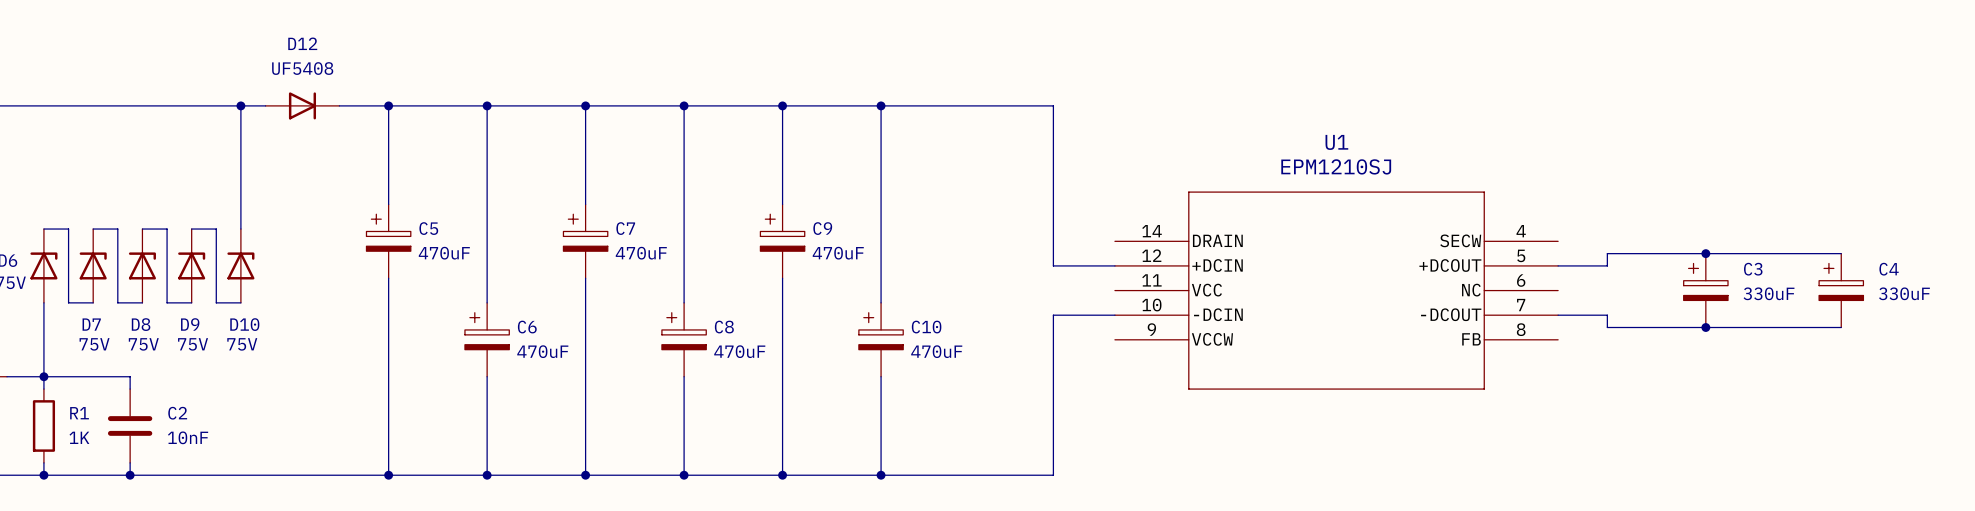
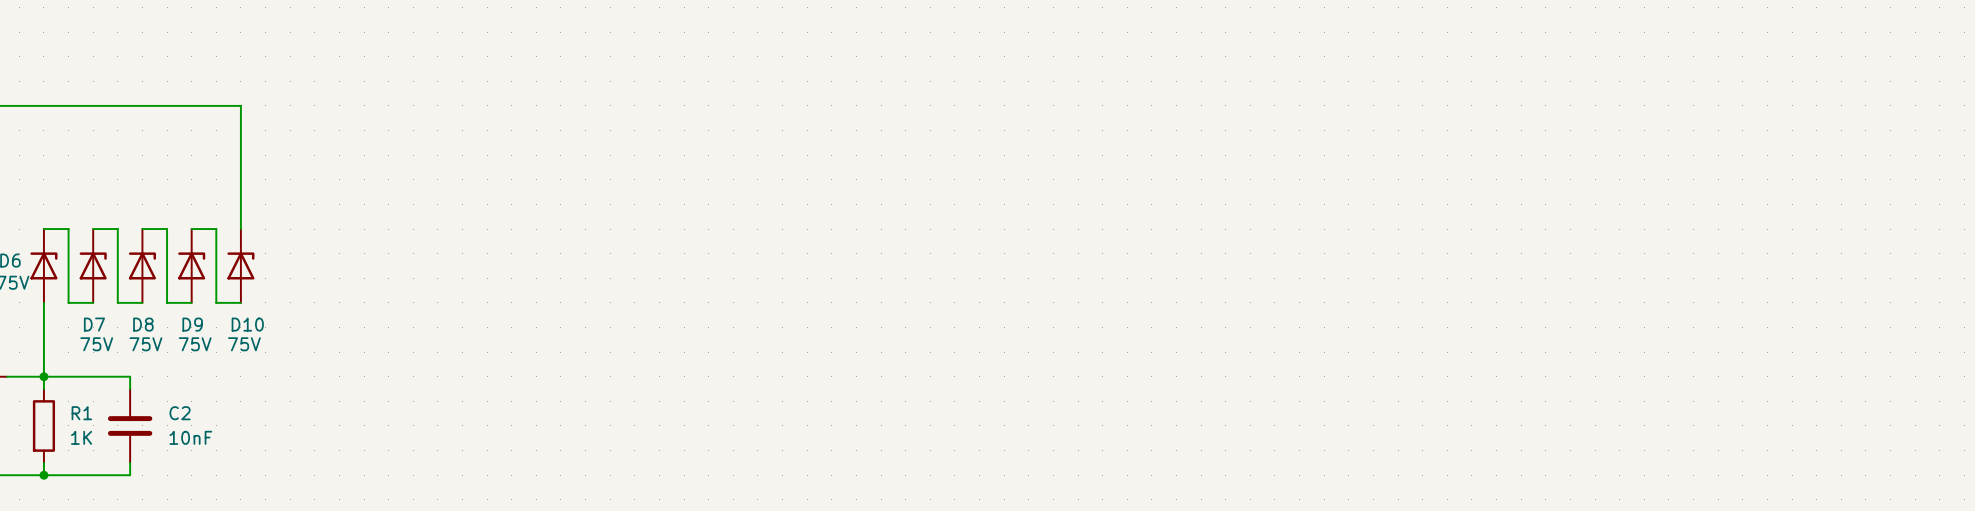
wire: (240, 105) (265, 105) -> none
junction: (240, 105) -> none
D12: UF5408 (302, 105) -> none
wire: (339, 105) (1053, 105) (1053, 265) (1114, 265) -> none
wire: (388, 105) (388, 204) -> none
junction: (388, 105) -> none
wire: (487, 105) (487, 302) -> none
junction: (487, 105) -> none
wire: (585, 105) (585, 204) -> none
junction: (585, 105) -> none
wire: (684, 105) (684, 302) -> none
junction: (684, 105) -> none
wire: (782, 105) (782, 204) -> none
junction: (782, 105) -> none
wire: (881, 105) (881, 302) -> none
junction: (881, 105) -> none
C5: 470uF (388, 241) -> none
C7: 470uF (585, 241) -> none
C9: 470uF (782, 241) -> none
junction: (1705, 253) -> none
wire: (1841, 253) (1607, 253) (1607, 265) (1558, 265) -> none
wire: (388, 278) (388, 475) -> none
wire: (585, 278) (585, 475) -> none
wire: (782, 278) (782, 475) -> none
U1: EPM1210SJ (1336, 290) -> none
C3: 330uF (1705, 290) -> none
C4: 330uF (1841, 290) -> none
wire: (1114, 315) (1053, 315) (1053, 475) (130, 475) -> none
wire: (1558, 315) (1607, 315) (1607, 327) (1841, 327) -> none
junction: (1705, 327) -> none
C6: 470uF (487, 339) -> none
C8: 470uF (684, 339) -> none
C10: 470uF (881, 339) -> none
wire: (487, 376) (487, 475) -> none
wire: (684, 376) (684, 475) -> none
wire: (881, 376) (881, 475) -> none
junction: (130, 475) -> none
junction: (388, 475) -> none
junction: (487, 475) -> none
junction: (585, 475) -> none
junction: (684, 475) -> none
junction: (782, 475) -> none
junction: (881, 475) -> none

